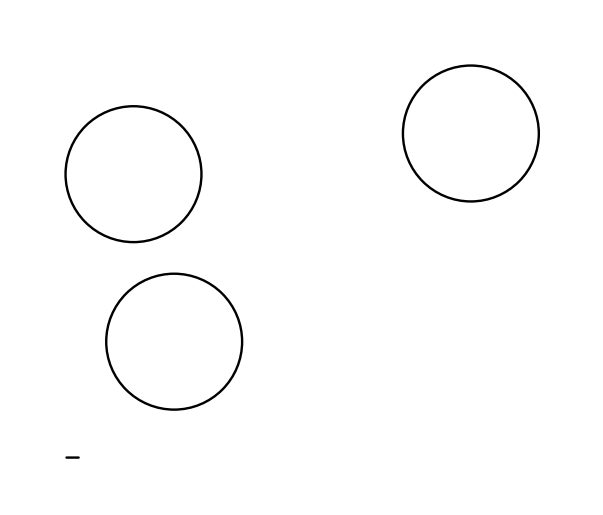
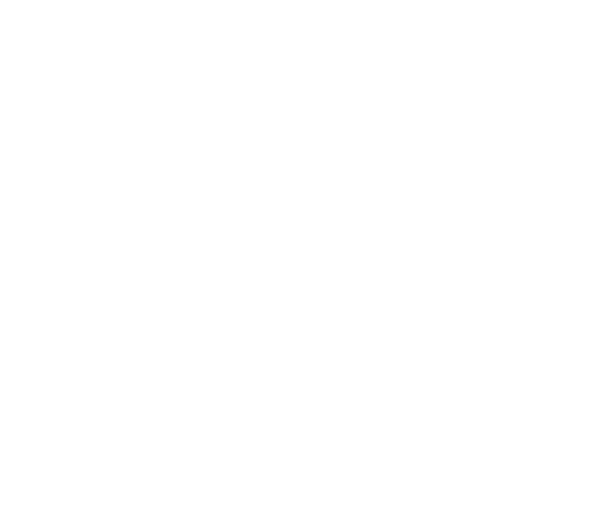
round board edge: [401, 64, 541, 203] -> none
round board edge: [64, 105, 203, 244] -> none
round board edge: [105, 272, 244, 411] -> none
board edge: (66, 457) (78, 457) -> none

